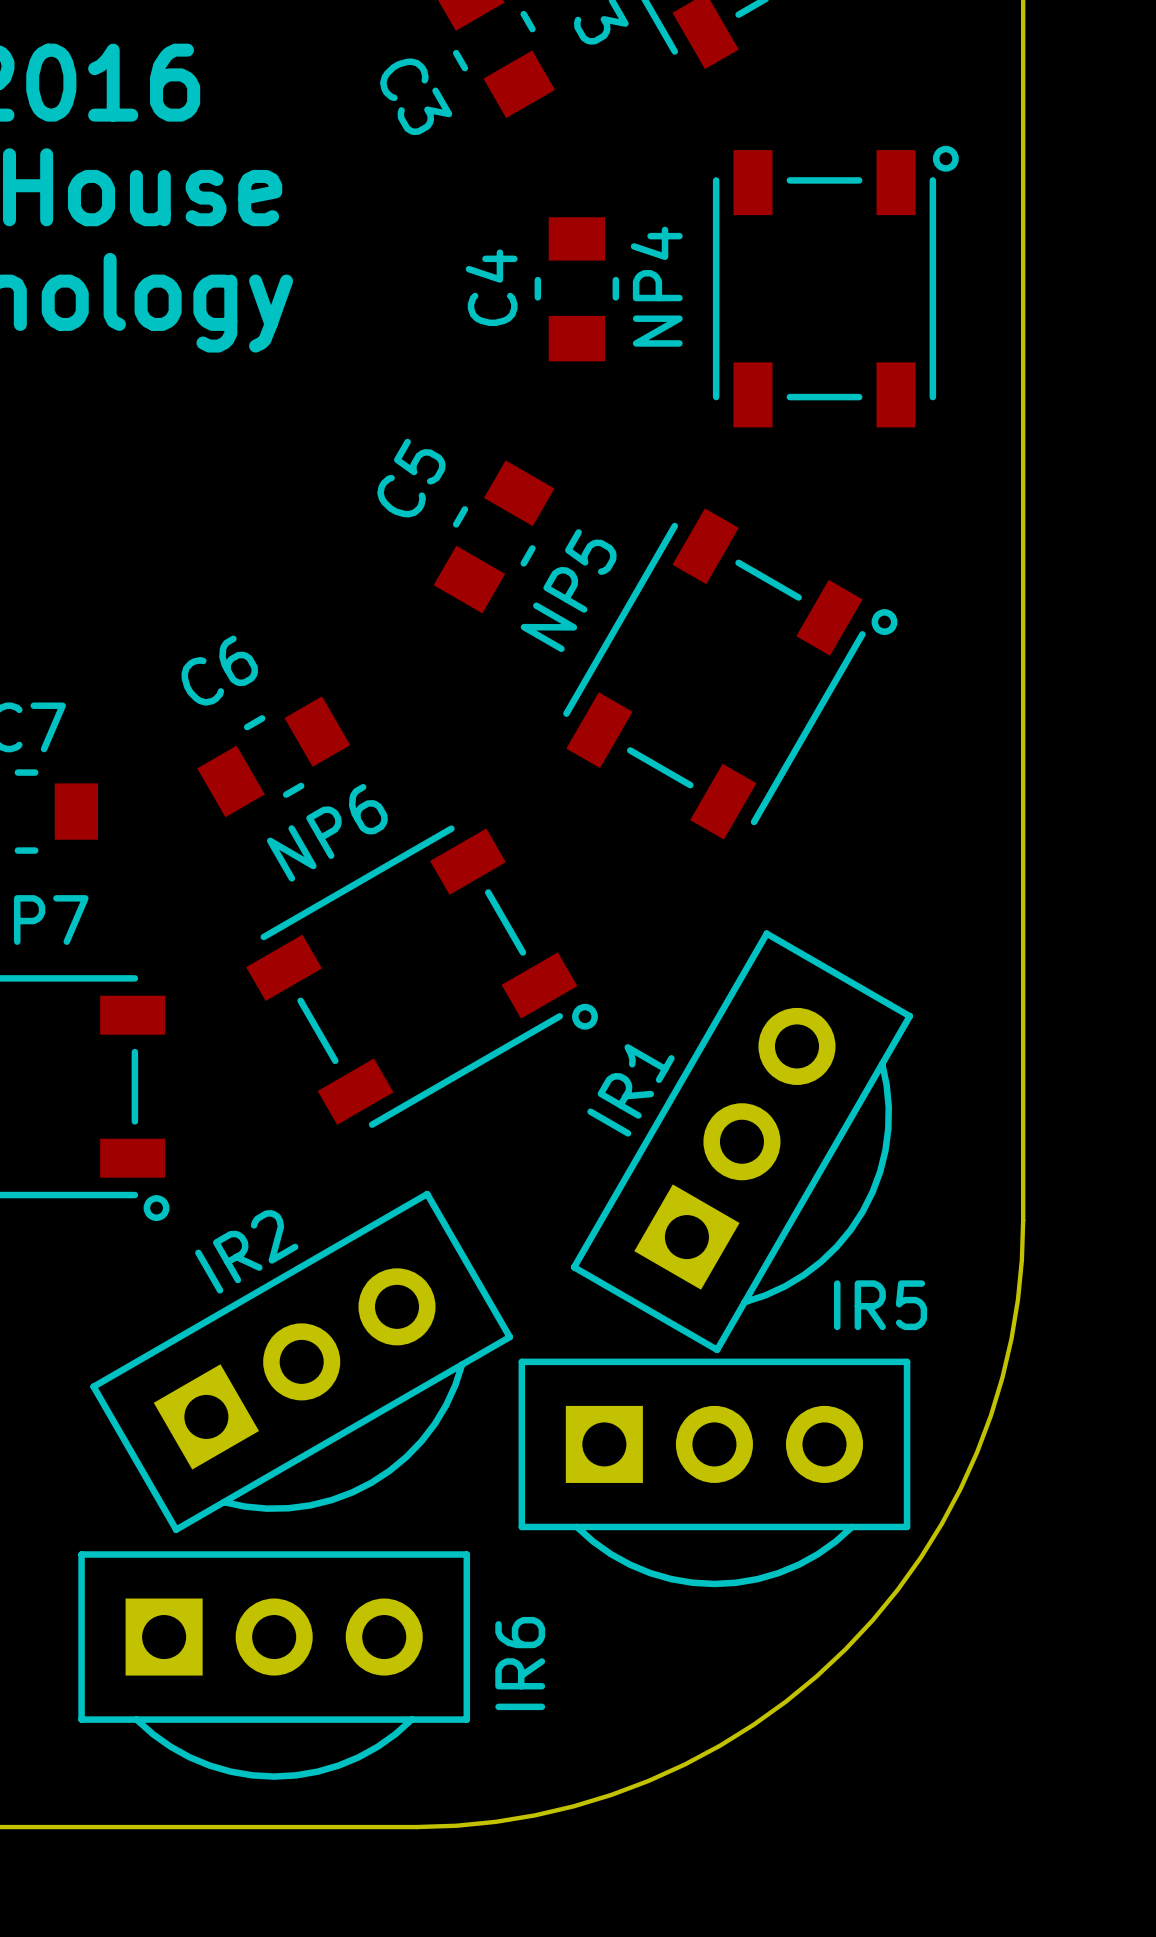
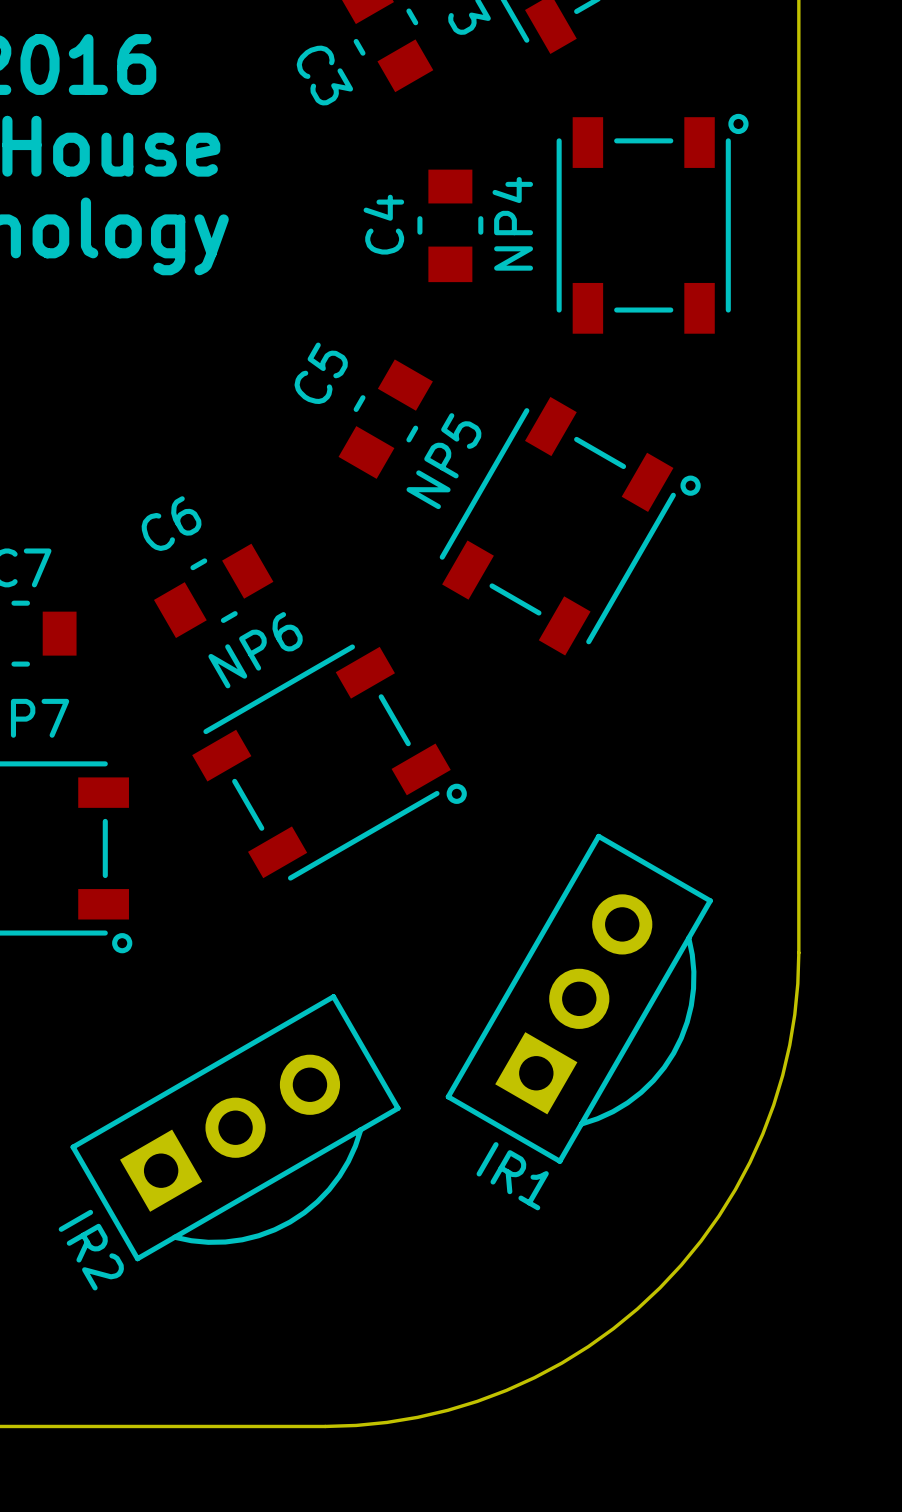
IR1 name rotation: 0° (631, 1090) -> 90° clockwise (512, 1176)
IR1 name position: IR1 (631, 1090) -> IR1 (512, 1176)
IR1 position: (741, 1141) -> (579, 998)
IR2 name rotation: 0° (246, 1251) -> 90° clockwise (91, 1250)
IR2 name position: IR2 (246, 1251) -> IR2 (91, 1250)
IR2 position: (301, 1361) -> (235, 1127)
IR5: (714, 1472) -> none
IR6: (274, 1665) -> none

